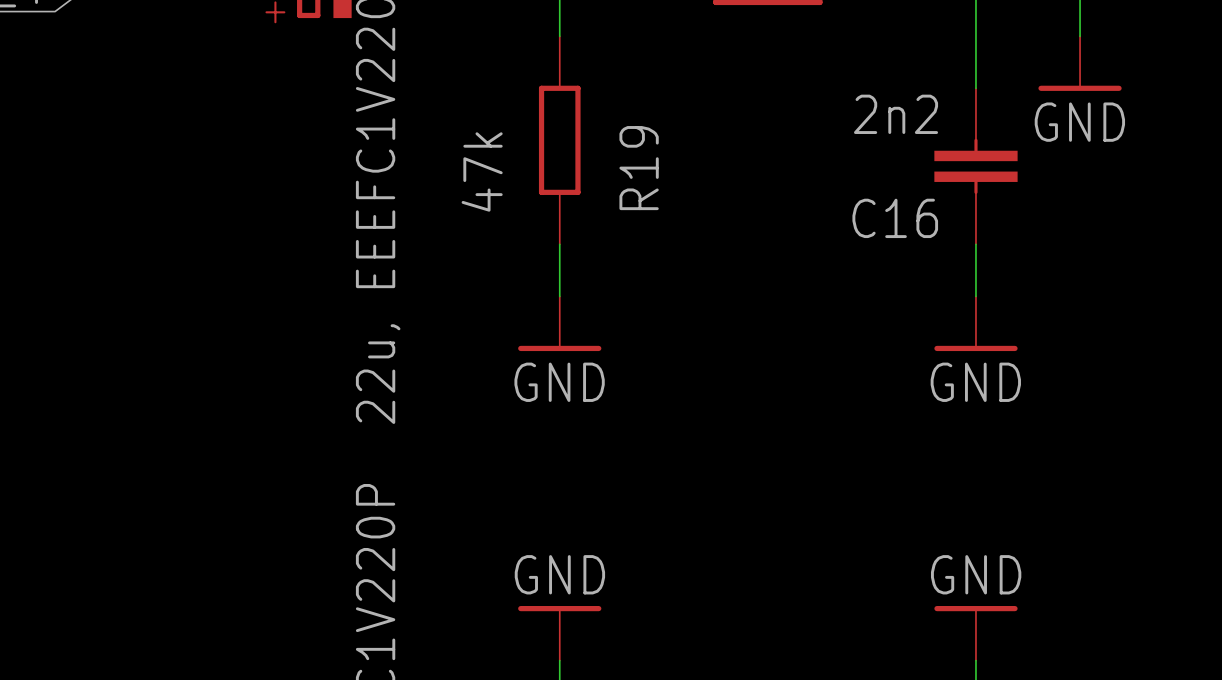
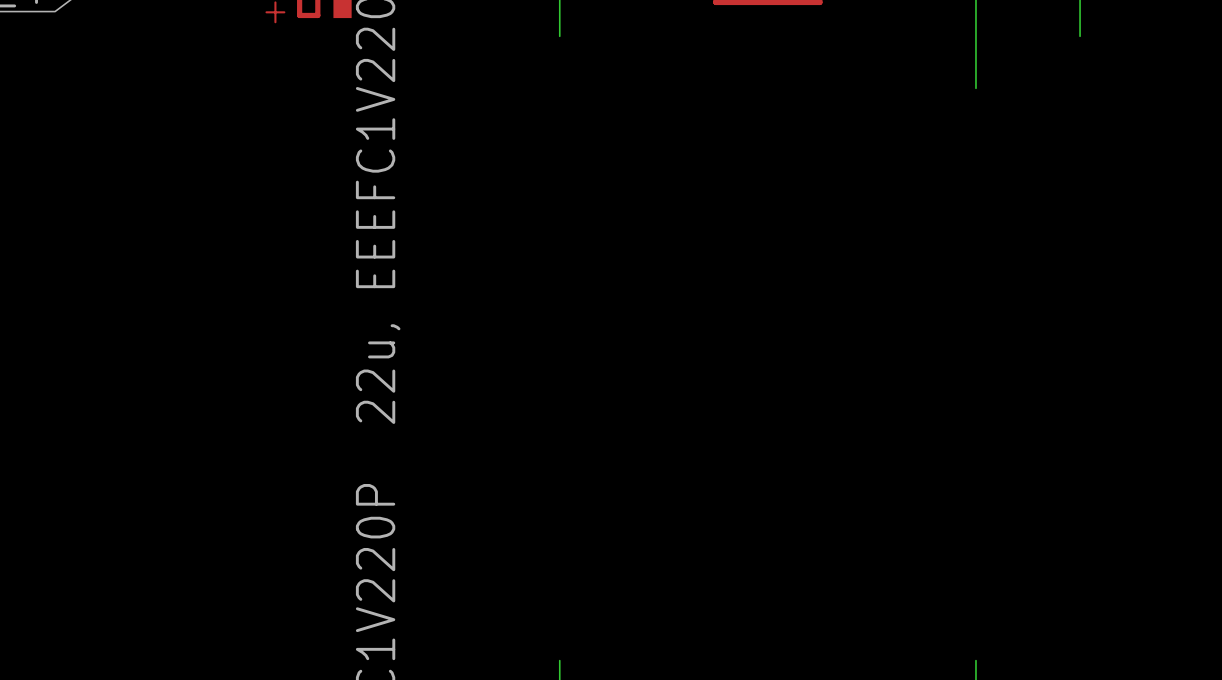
power symbol: GND (1080, 63) -> none
R19: 47k (559, 140) -> none
C16: 2n2 (975, 166) -> none
wire: (559, 244) (559, 296) -> none
wire: (975, 244) (975, 296) -> none
power symbol: GND (559, 323) -> none
power symbol: GND (975, 323) -> none
power symbol: GND (559, 633) -> none
power symbol: GND (975, 633) -> none

